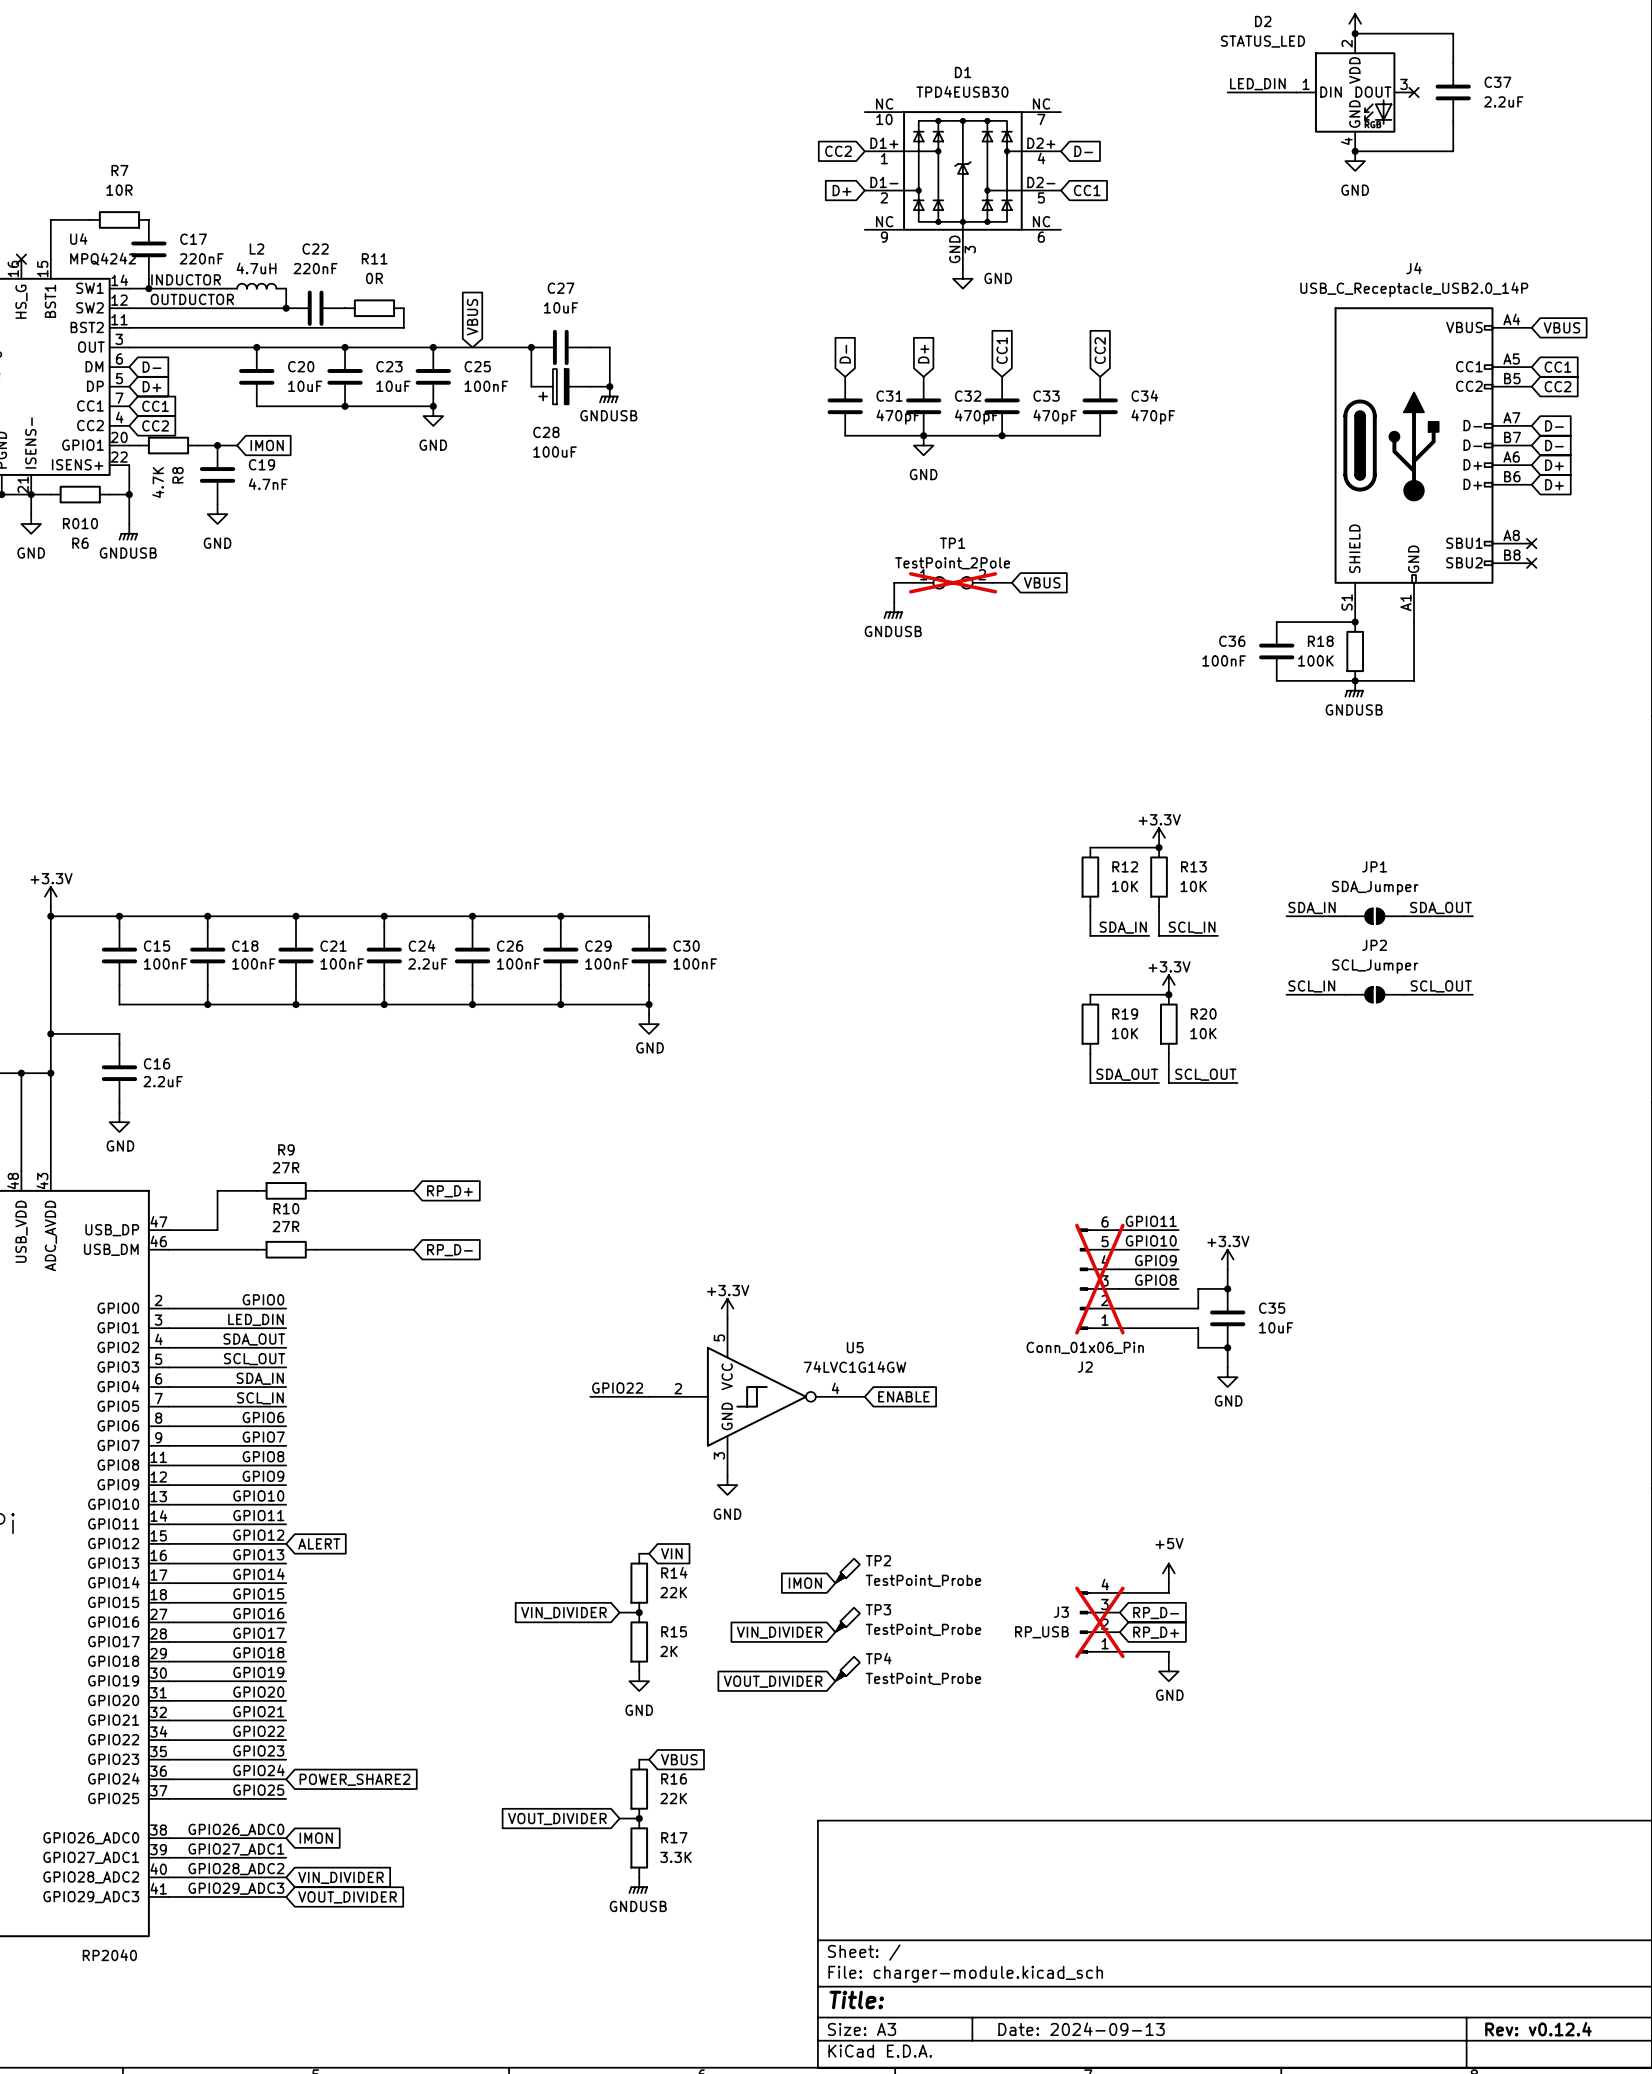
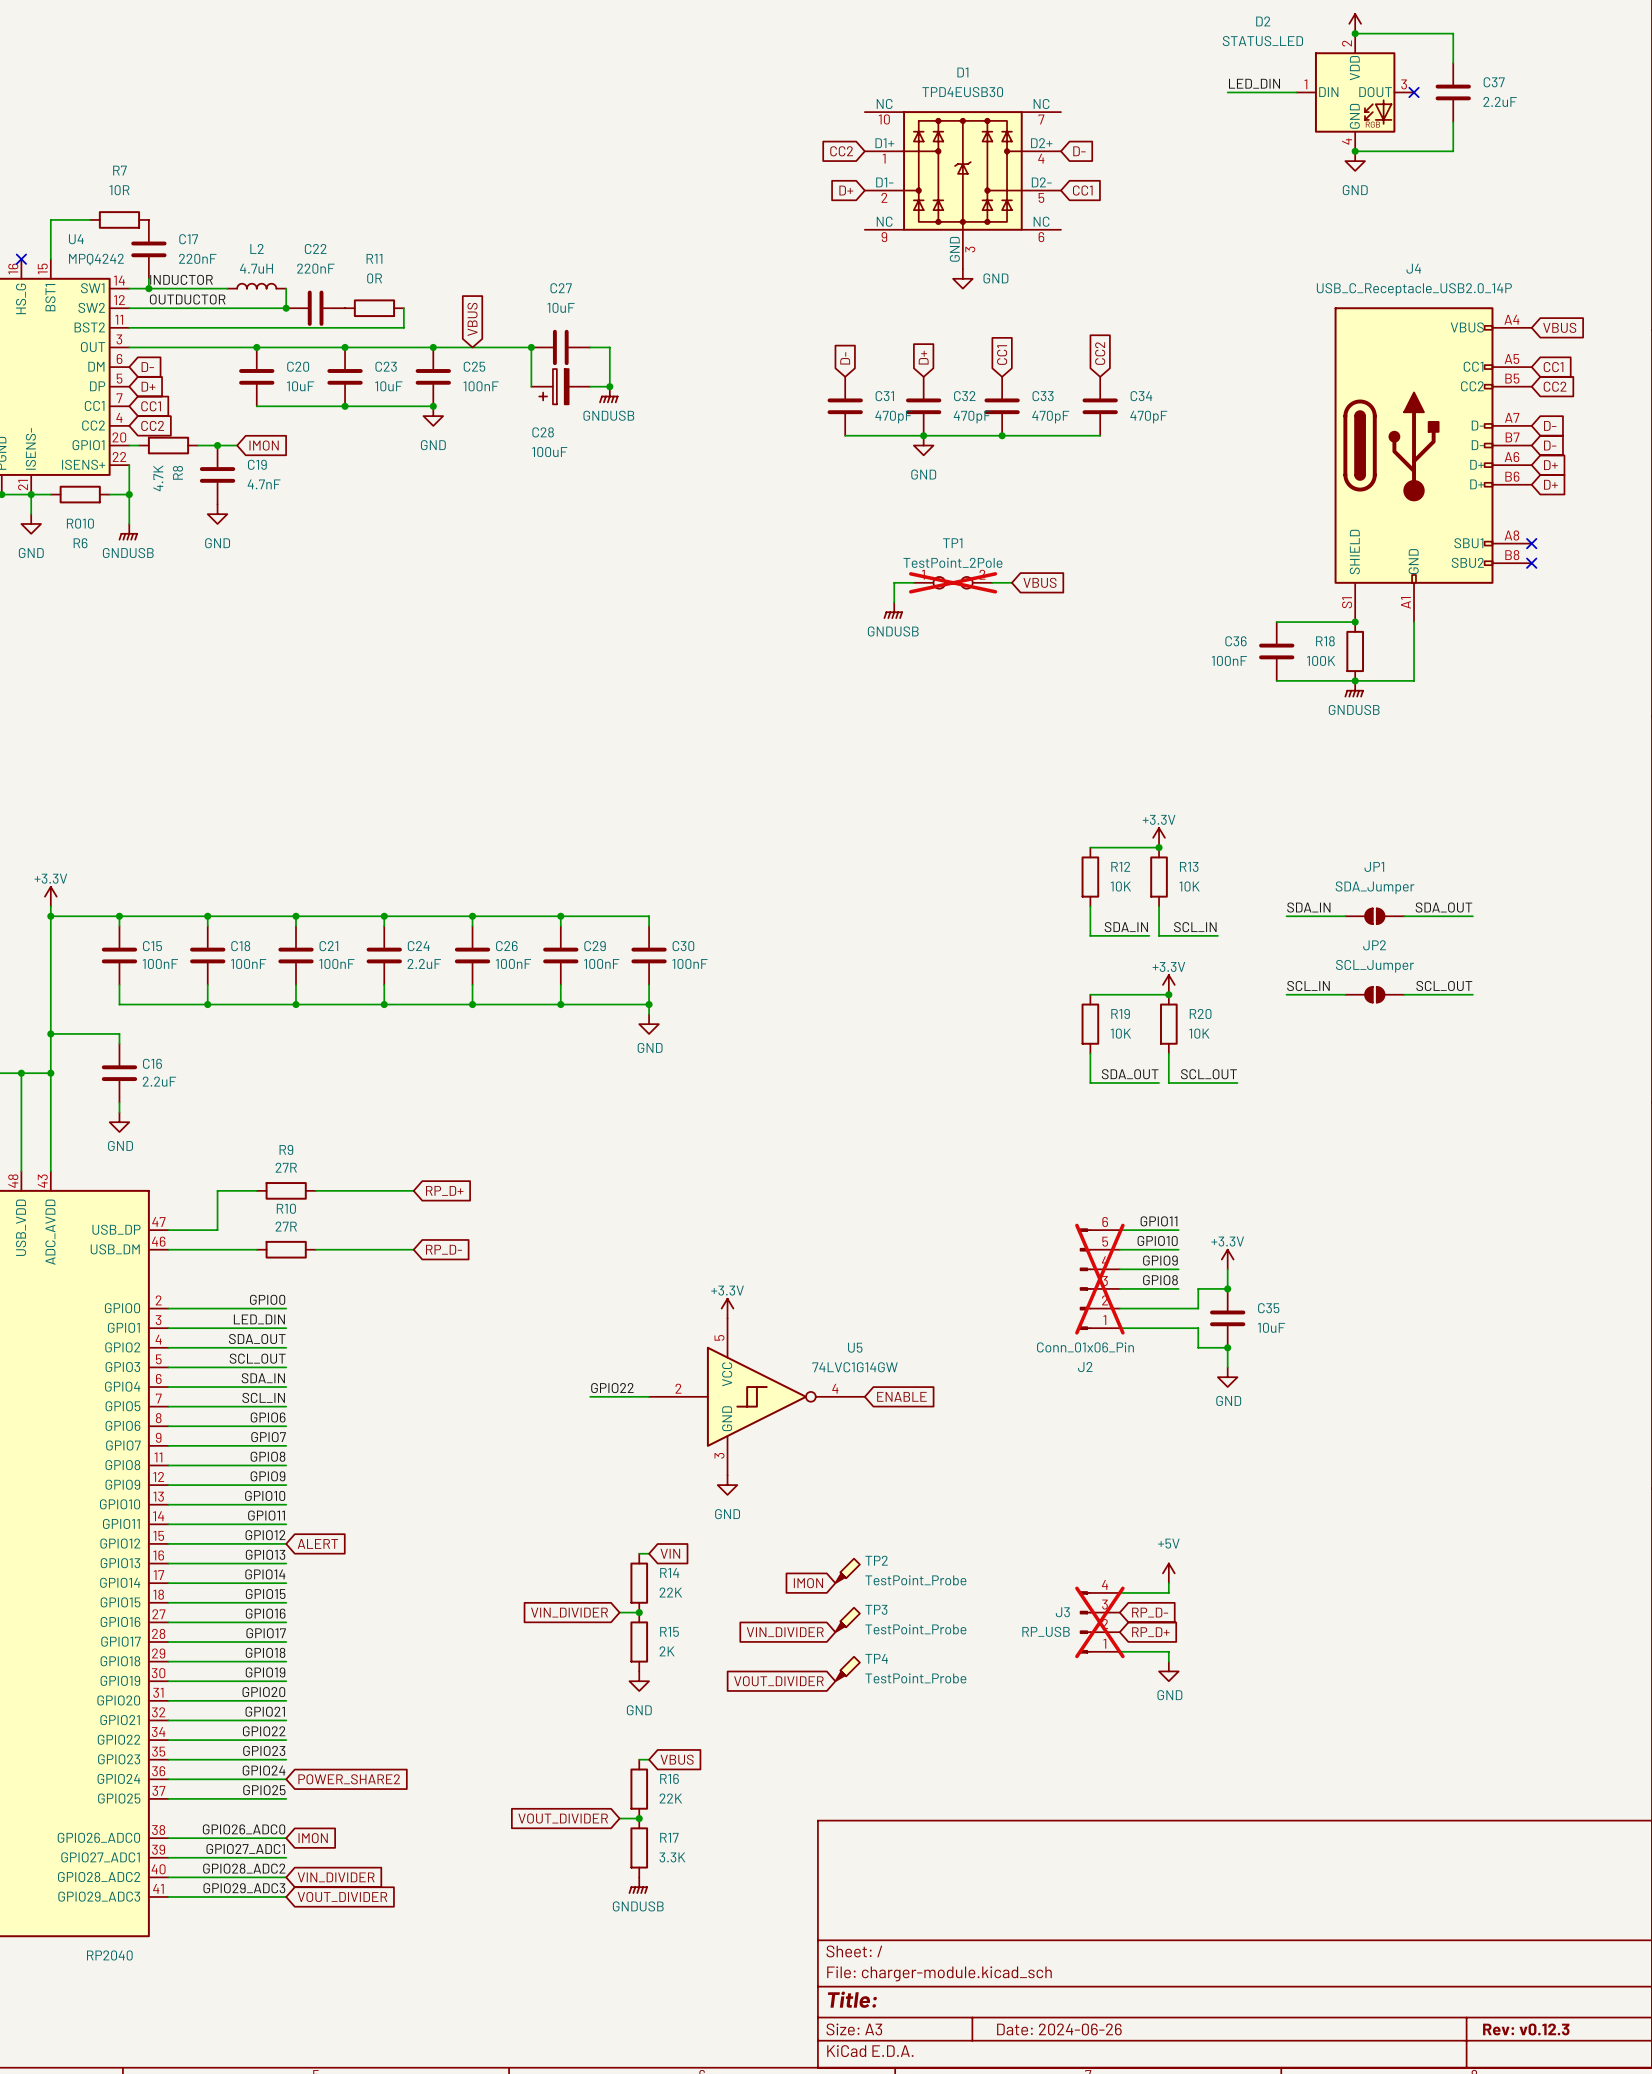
title block: Date: 2024-09-13 (1081, 2029) -> Date: 2024-06-26 (1059, 2029)
title block: Rev: v0.12.4 (1538, 2029) -> Rev: v0.12.3 (1526, 2029)

